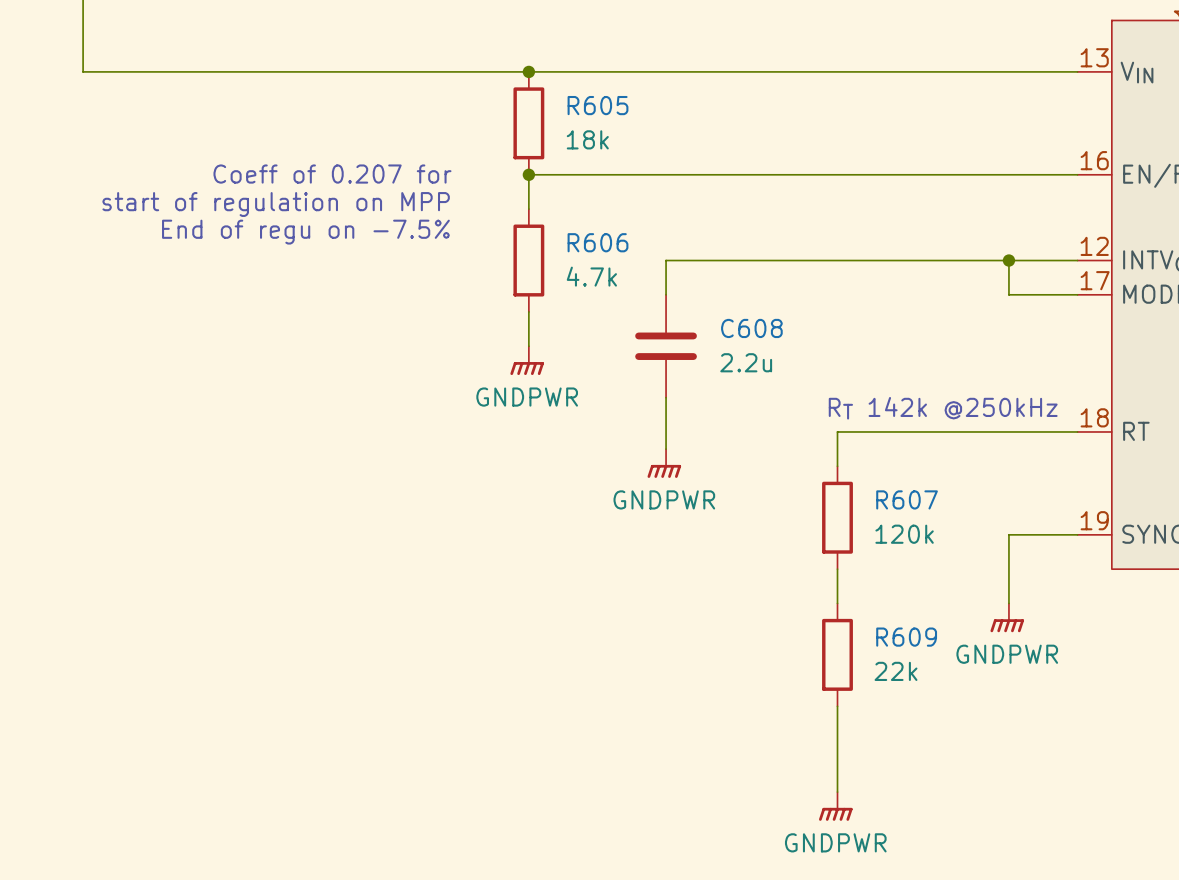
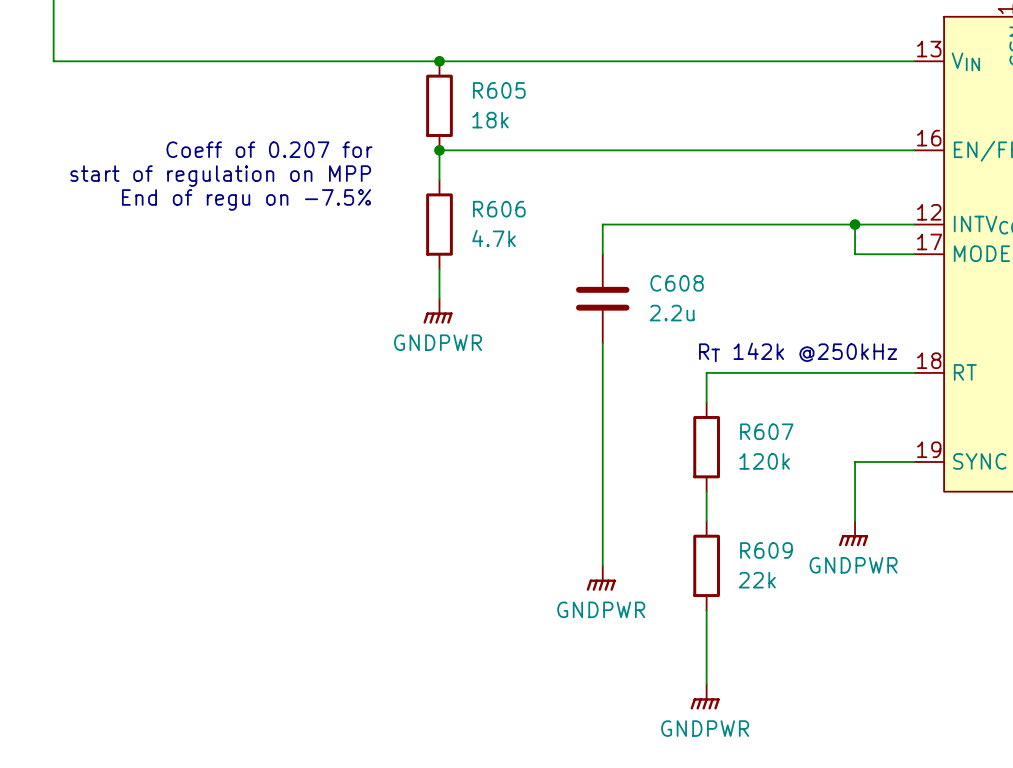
wire: (717, 260) (666, 260) (666, 294) -> (602, 224) (602, 254)
C608 position: (666, 346) -> (602, 298)
wire: (666, 397) (666, 449) -> none
wire: none -> (602, 343) (602, 565)
power symbol position: GNDPWR (664, 463) -> GNDPWR (601, 578)

